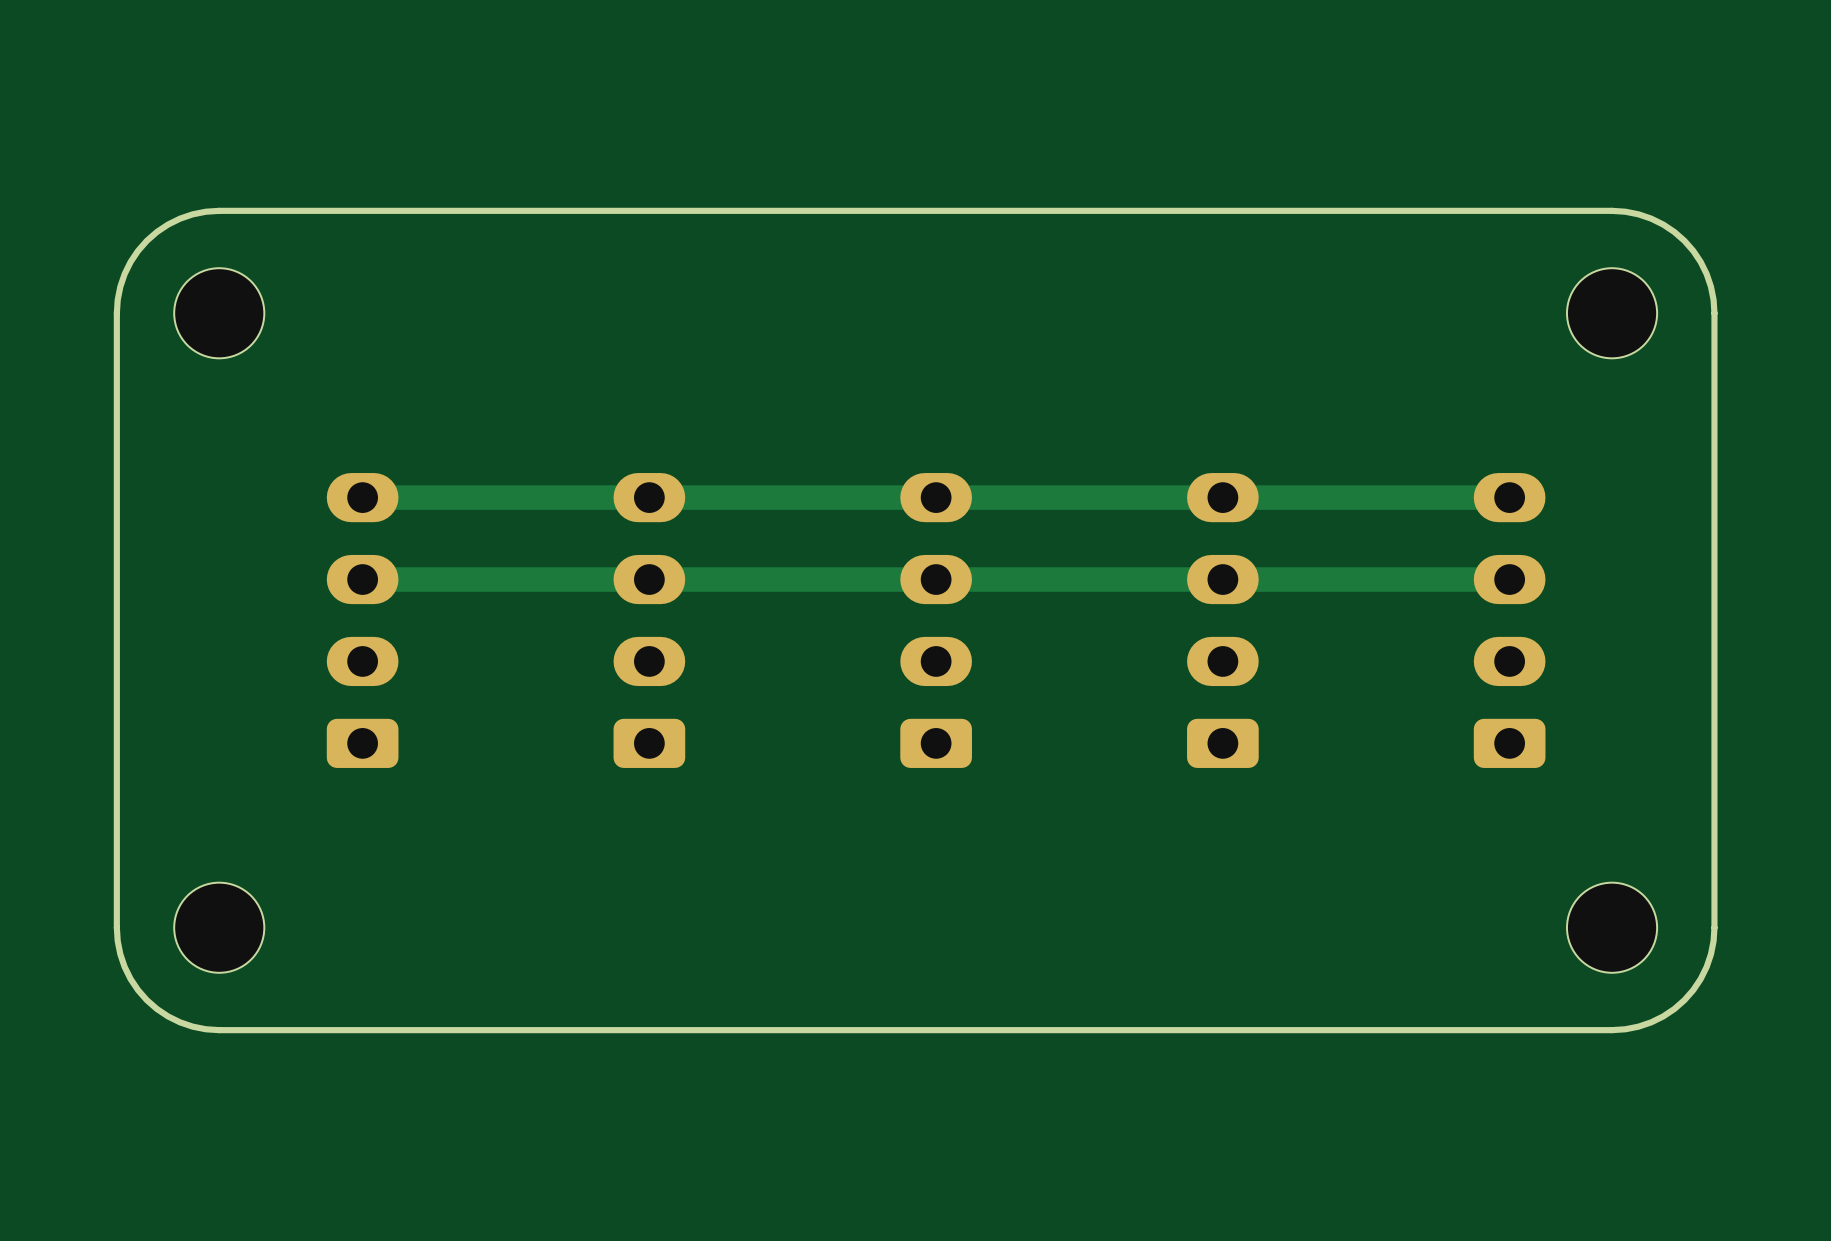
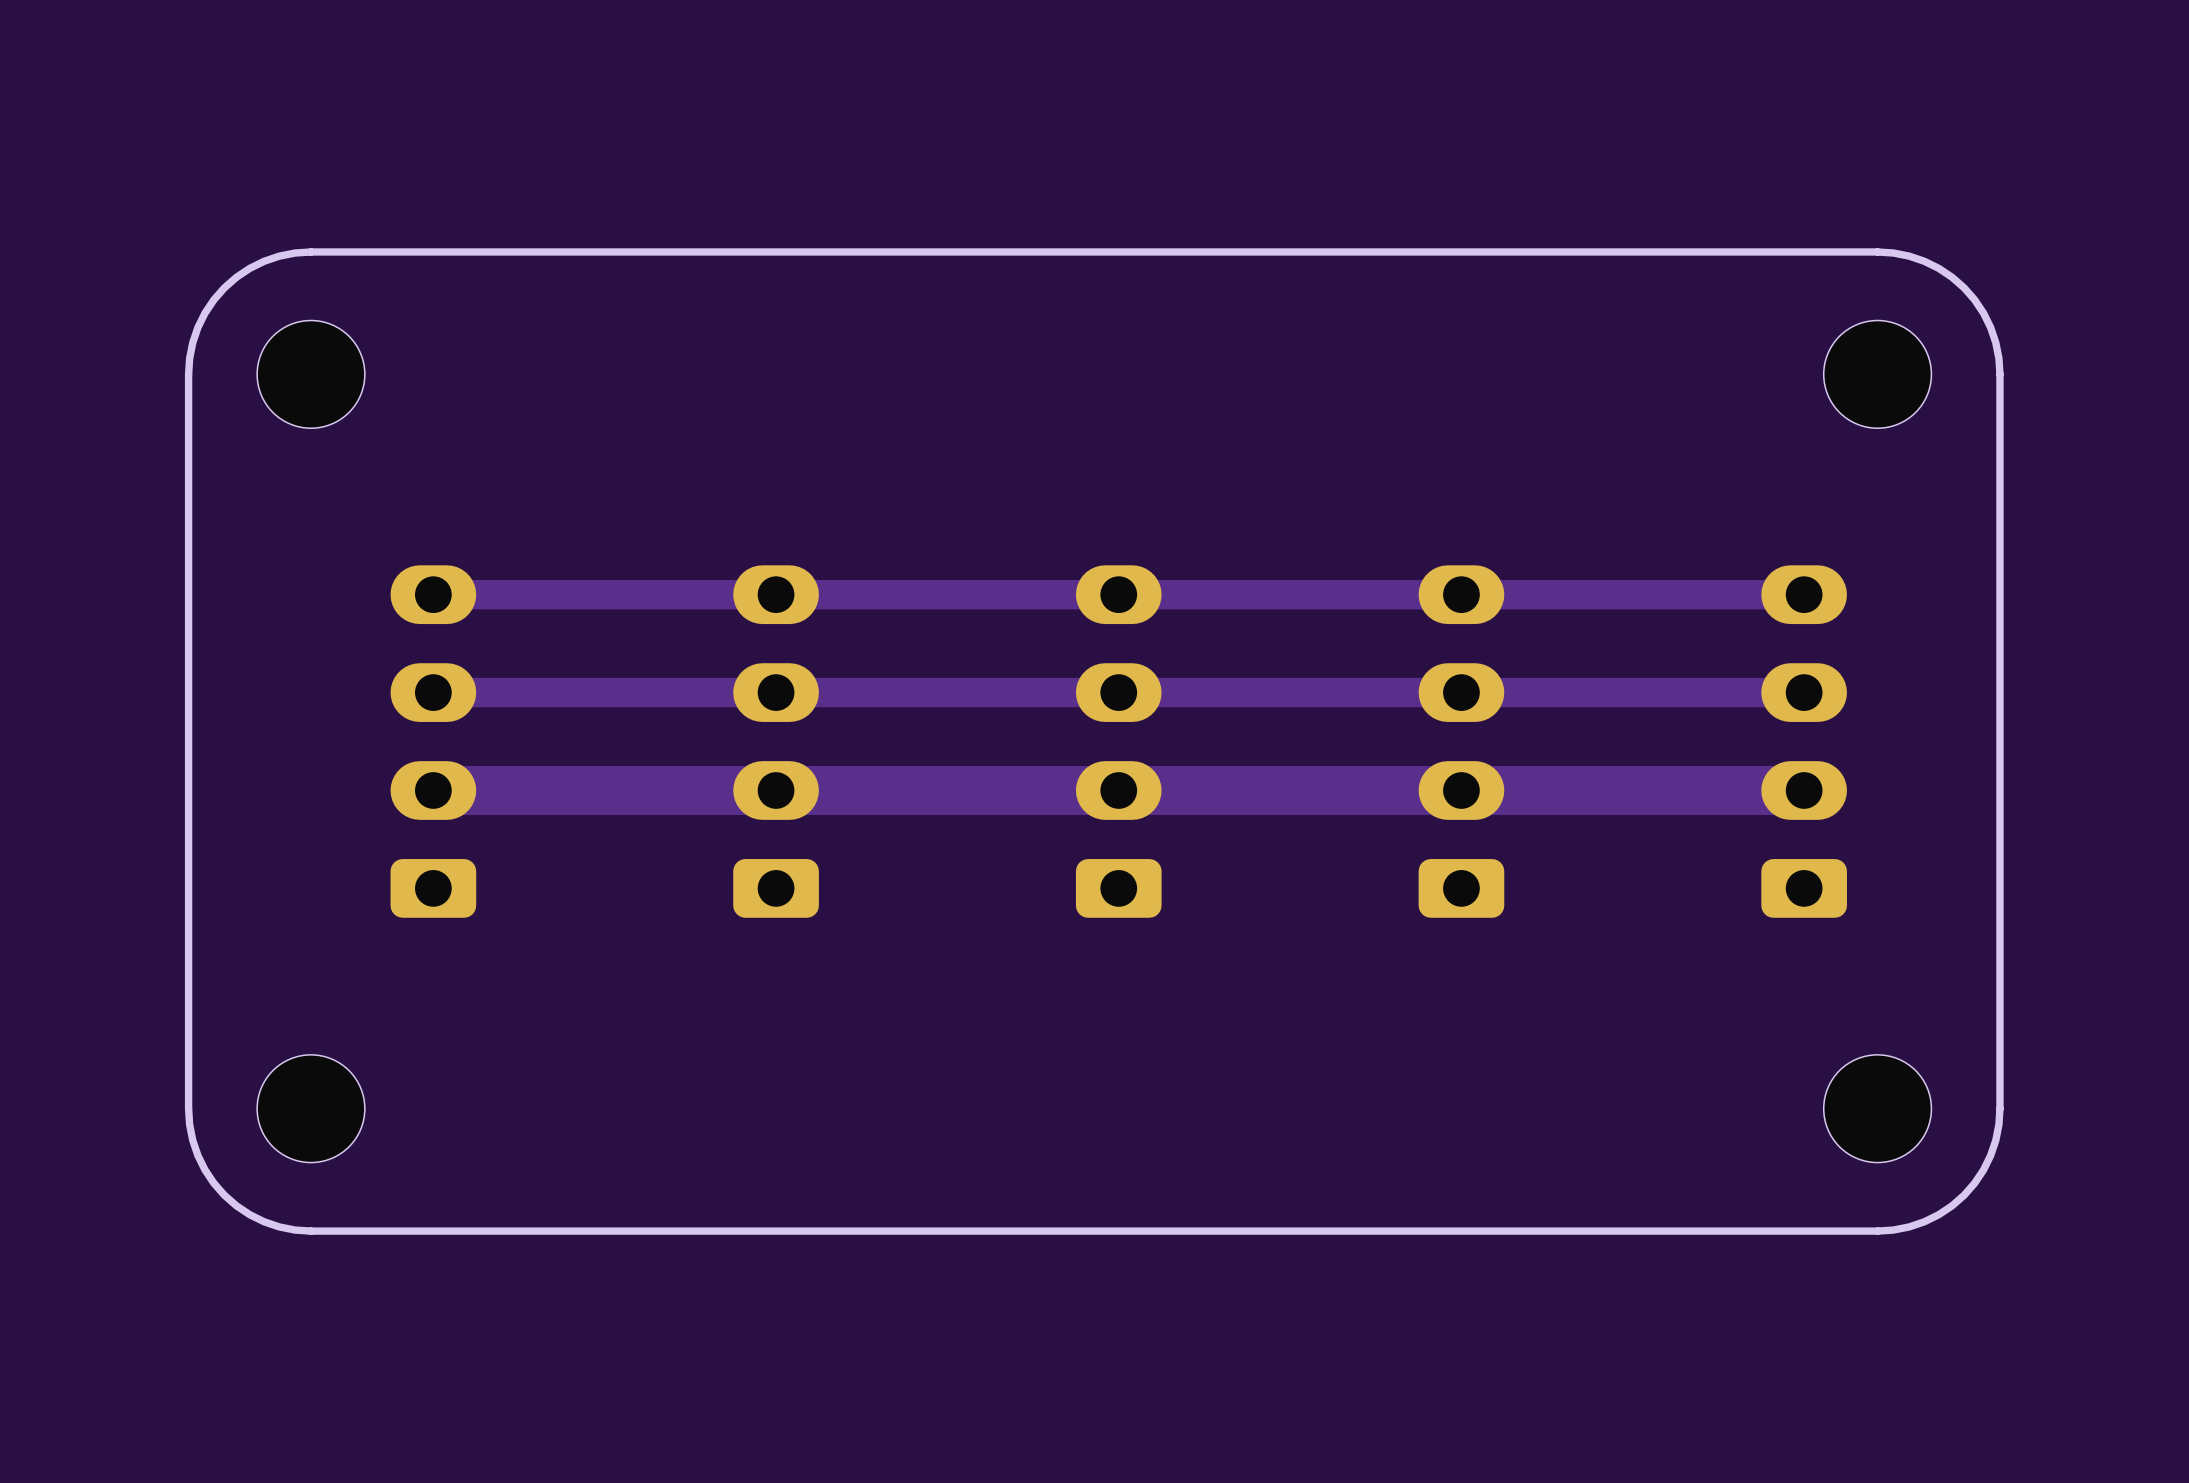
board edge: (260, 210) (219, 210) (192, 214) (180, 218) (156, 232) (146, 240) (130, 262) (120, 286) (116, 313) (116, 927) (120, 954) (130, 978) (138, 990) (156, 1008) (168, 1016) (180, 1022) (205, 1029) (260, 1030) -> (310, 251) (295, 253) (264, 261) (236, 277) (224, 287) (204, 313) (197, 327) (189, 358) (188, 374) (189, 1124) (192, 1140) (204, 1169) (213, 1183) (236, 1205) (264, 1221) (295, 1230) (310, 1231)
board edge: (1571, 210) (1612, 210) (1638, 214) (1651, 218) (1674, 232) (1693, 250) (1700, 262) (1710, 286) (1714, 313) (1714, 927) (1710, 954) (1706, 966) (1693, 990) (1674, 1008) (1663, 1016) (1651, 1022) (1625, 1029) (1571, 1030) -> (1877, 251) (1893, 253) (1924, 261) (1952, 277) (1964, 287) (1974, 299) (1990, 327) (1998, 358) (1999, 374) (1998, 1124) (1990, 1155) (1983, 1169) (1974, 1183) (1952, 1205) (1924, 1221) (1909, 1226) (1877, 1231)
part position: (219, 313) -> (310, 374)
part position: (1612, 313) -> (1877, 374)
track: none -> (1804, 790) (433, 790)
part position: (219, 927) -> (310, 1108)
part position: (1612, 927) -> (1877, 1108)

